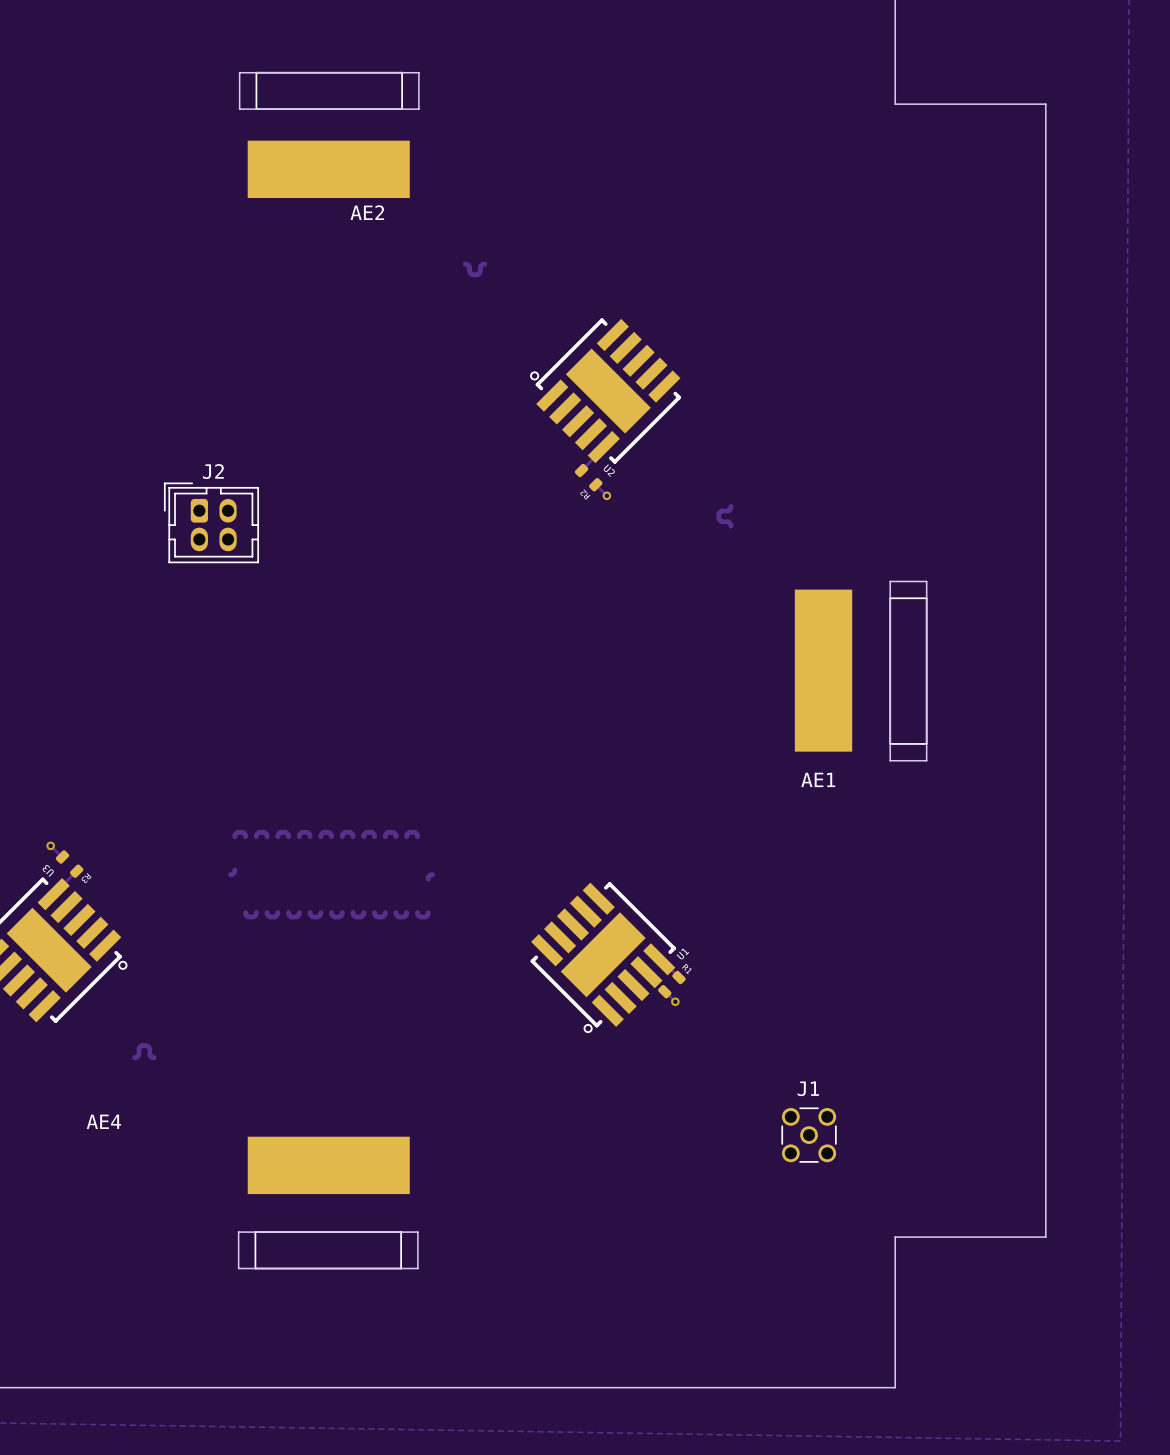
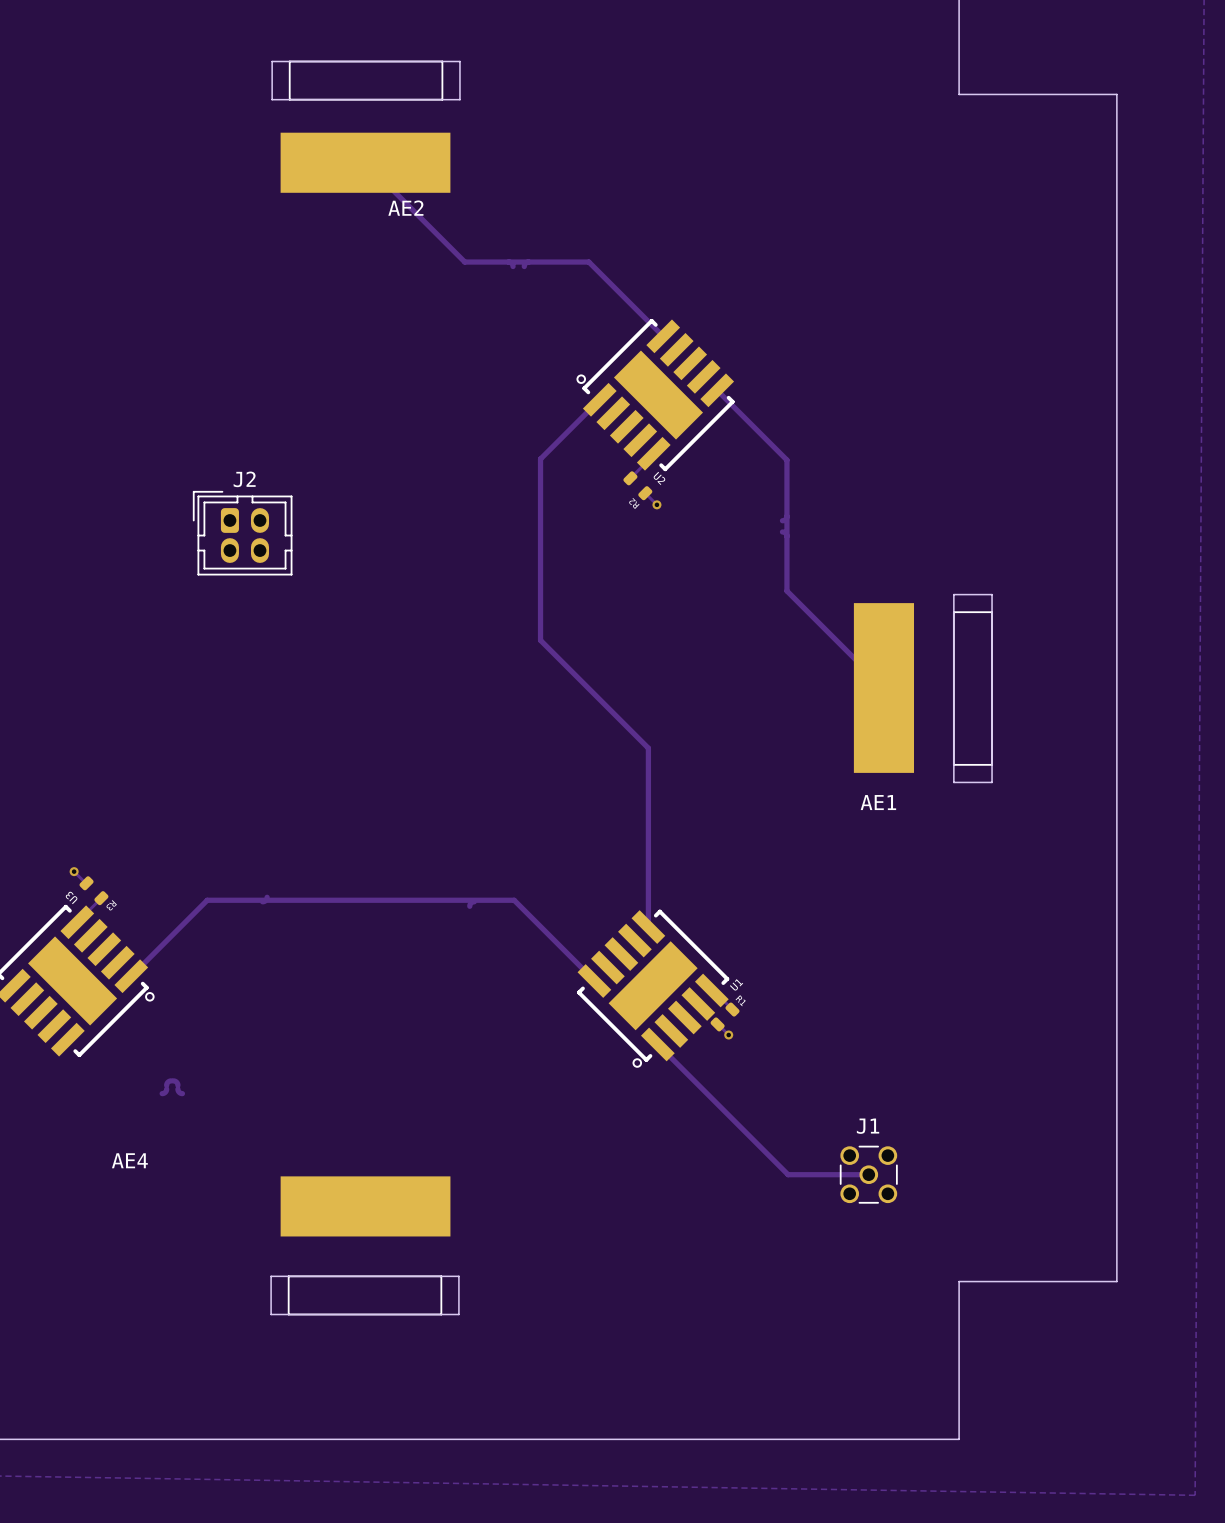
track: none -> (365, 162) (464, 262) (588, 262) (663, 336)
track: (469, 270) (473, 274) -> none
track: (480, 270) (475, 274) -> none
track: none -> (717, 390) (786, 460) (786, 591) (883, 688)
track: none -> (599, 399) (540, 459) (540, 640) (648, 748) (648, 927)
track: (723, 510) (718, 515) -> none
track: (718, 517) (723, 521) -> none
track: (239, 832) (234, 836) -> none
track: (241, 832) (245, 836) -> none
track: (260, 832) (256, 836) -> none
track: (262, 832) (267, 836) -> none
track: (282, 832) (277, 836) -> none
track: (284, 832) (288, 836) -> none
track: (303, 832) (299, 836) -> none
track: (305, 832) (310, 836) -> none
track: (325, 832) (320, 836) -> none
track: (327, 832) (331, 836) -> none
track: (346, 832) (342, 836) -> none
track: (348, 832) (353, 836) -> none
track: (368, 832) (363, 836) -> none
track: (370, 832) (374, 836) -> none
track: (389, 832) (385, 836) -> none
track: (391, 832) (396, 836) -> none
track: (411, 832) (406, 836) -> none
track: (413, 832) (417, 836) -> none
track: (245, 912) (249, 917) -> none
track: (256, 912) (252, 917) -> none
track: (267, 912) (271, 917) -> none
track: (277, 912) (273, 917) -> none
track: (288, 912) (292, 917) -> none
track: (299, 912) (295, 917) -> none
track: (310, 912) (314, 917) -> none
track: (320, 912) (316, 917) -> none
track: (331, 912) (335, 917) -> none
track: (342, 912) (338, 917) -> none
track: (353, 912) (357, 917) -> none
track: (363, 912) (359, 917) -> none
track: (374, 912) (378, 917) -> none
track: (385, 912) (380, 917) -> none
track: (396, 912) (400, 917) -> none
track: (406, 912) (402, 917) -> none
track: (417, 912) (421, 917) -> none
track: (428, 912) (423, 917) -> none
track: none -> (131, 976) (207, 900) (514, 900) (594, 981)
track: none -> (657, 1044) (788, 1174) (868, 1174)

